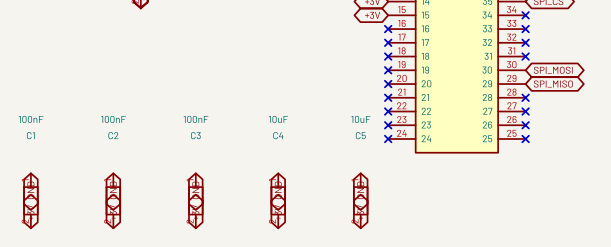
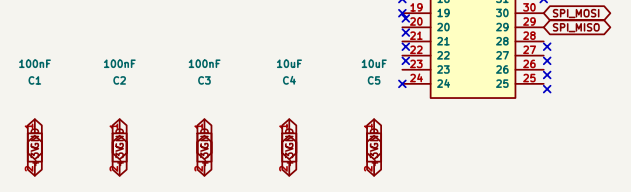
no-connect mark: none -> (405, 18)
no-connect mark: (388, 84) -> none
no-connect mark: none -> (405, 32)
no-connect mark: (388, 97) -> none
no-connect mark: (525, 97) -> none
no-connect mark: none -> (405, 46)
no-connect mark: none -> (547, 46)
no-connect mark: (388, 111) -> none
no-connect mark: (525, 111) -> none
no-connect mark: none -> (405, 60)
no-connect mark: none -> (547, 60)
no-connect mark: (388, 125) -> none
no-connect mark: (525, 125) -> none
no-connect mark: none -> (547, 74)
no-connect mark: (525, 138) -> none
no-connect mark: none -> (547, 89)

